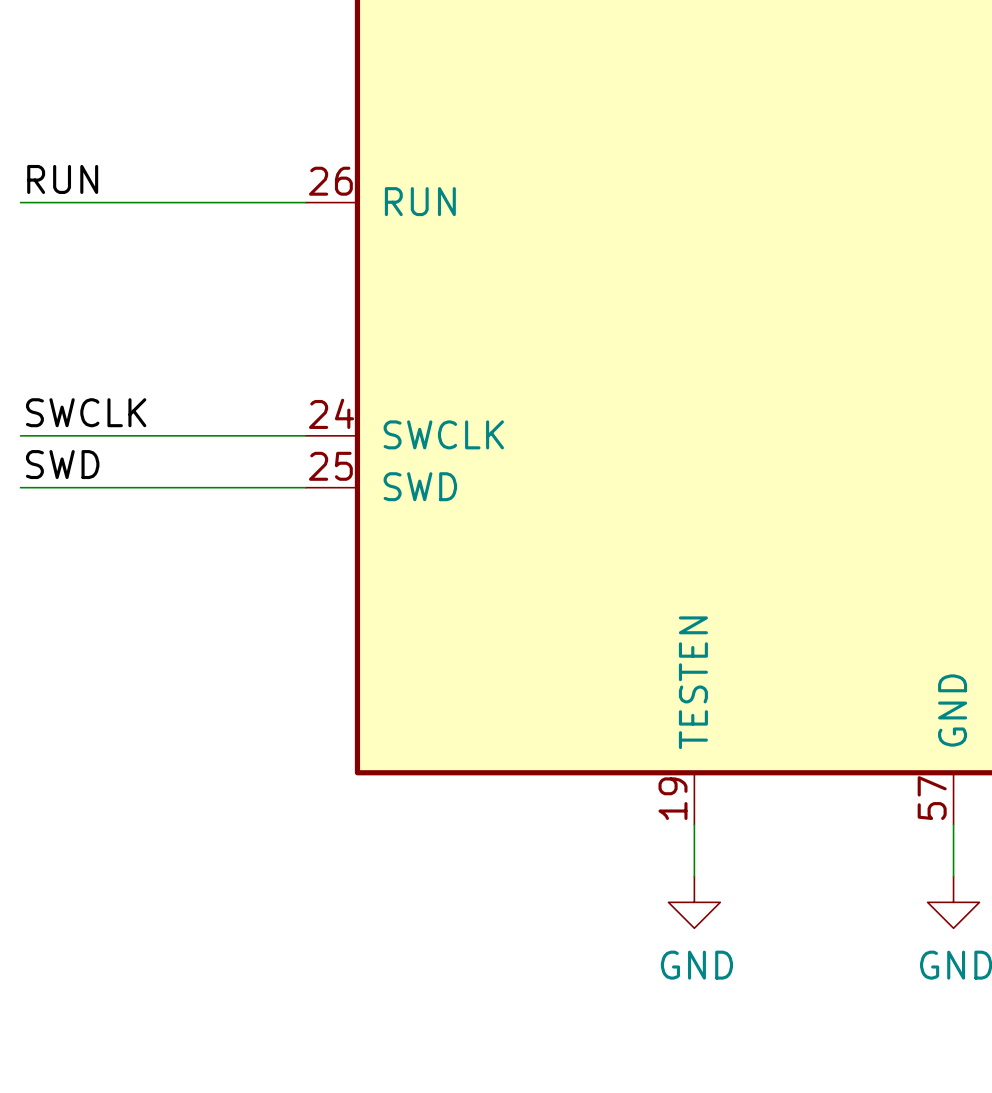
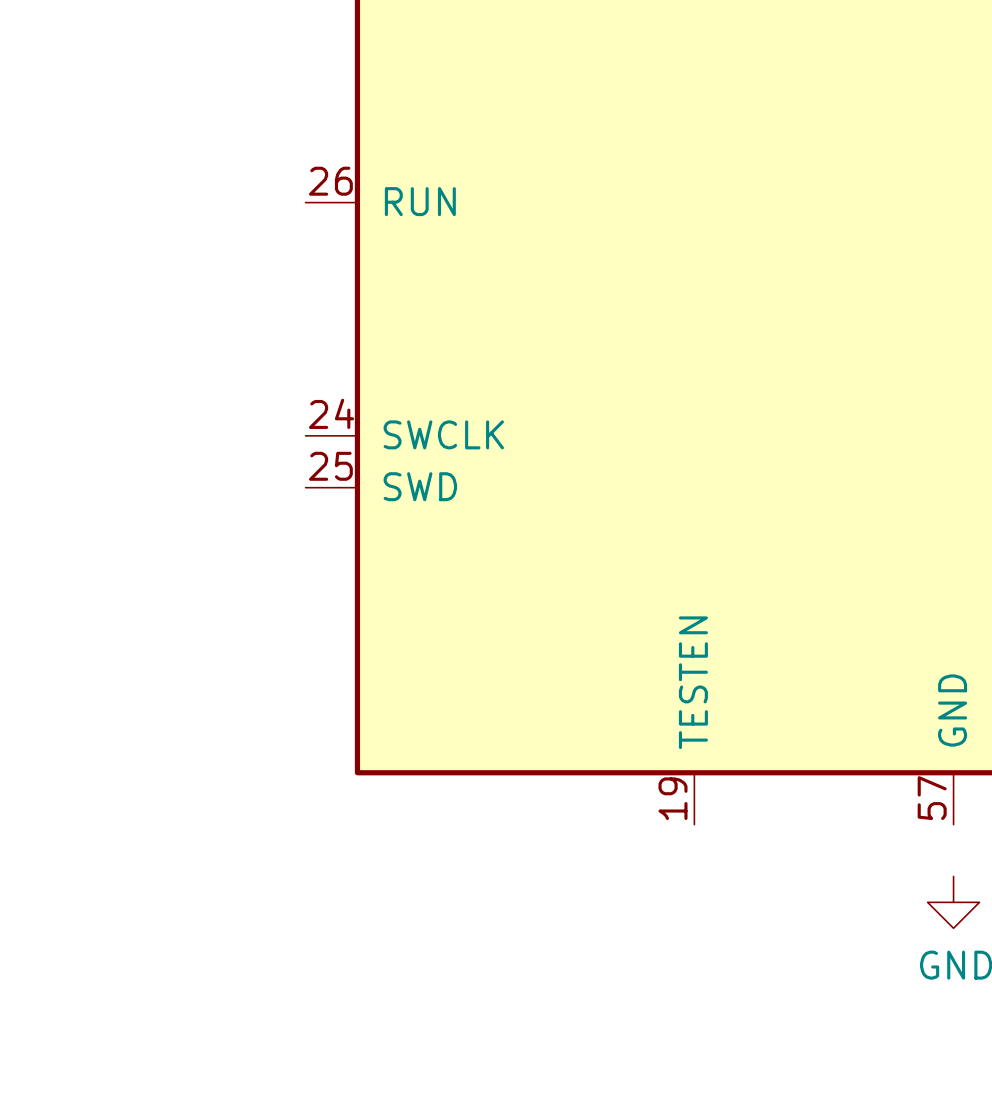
label: RUN (62, 179) -> none
wire: (20, 202) (305, 202) -> none
label: SWCLK (86, 412) -> none
wire: (20, 435) (305, 435) -> none
label: SWD (62, 464) -> none
wire: (20, 487) (305, 487) -> none
wire: (694, 824) (694, 876) -> none
wire: (953, 824) (953, 876) -> none
power symbol: GND (694, 902) -> none

